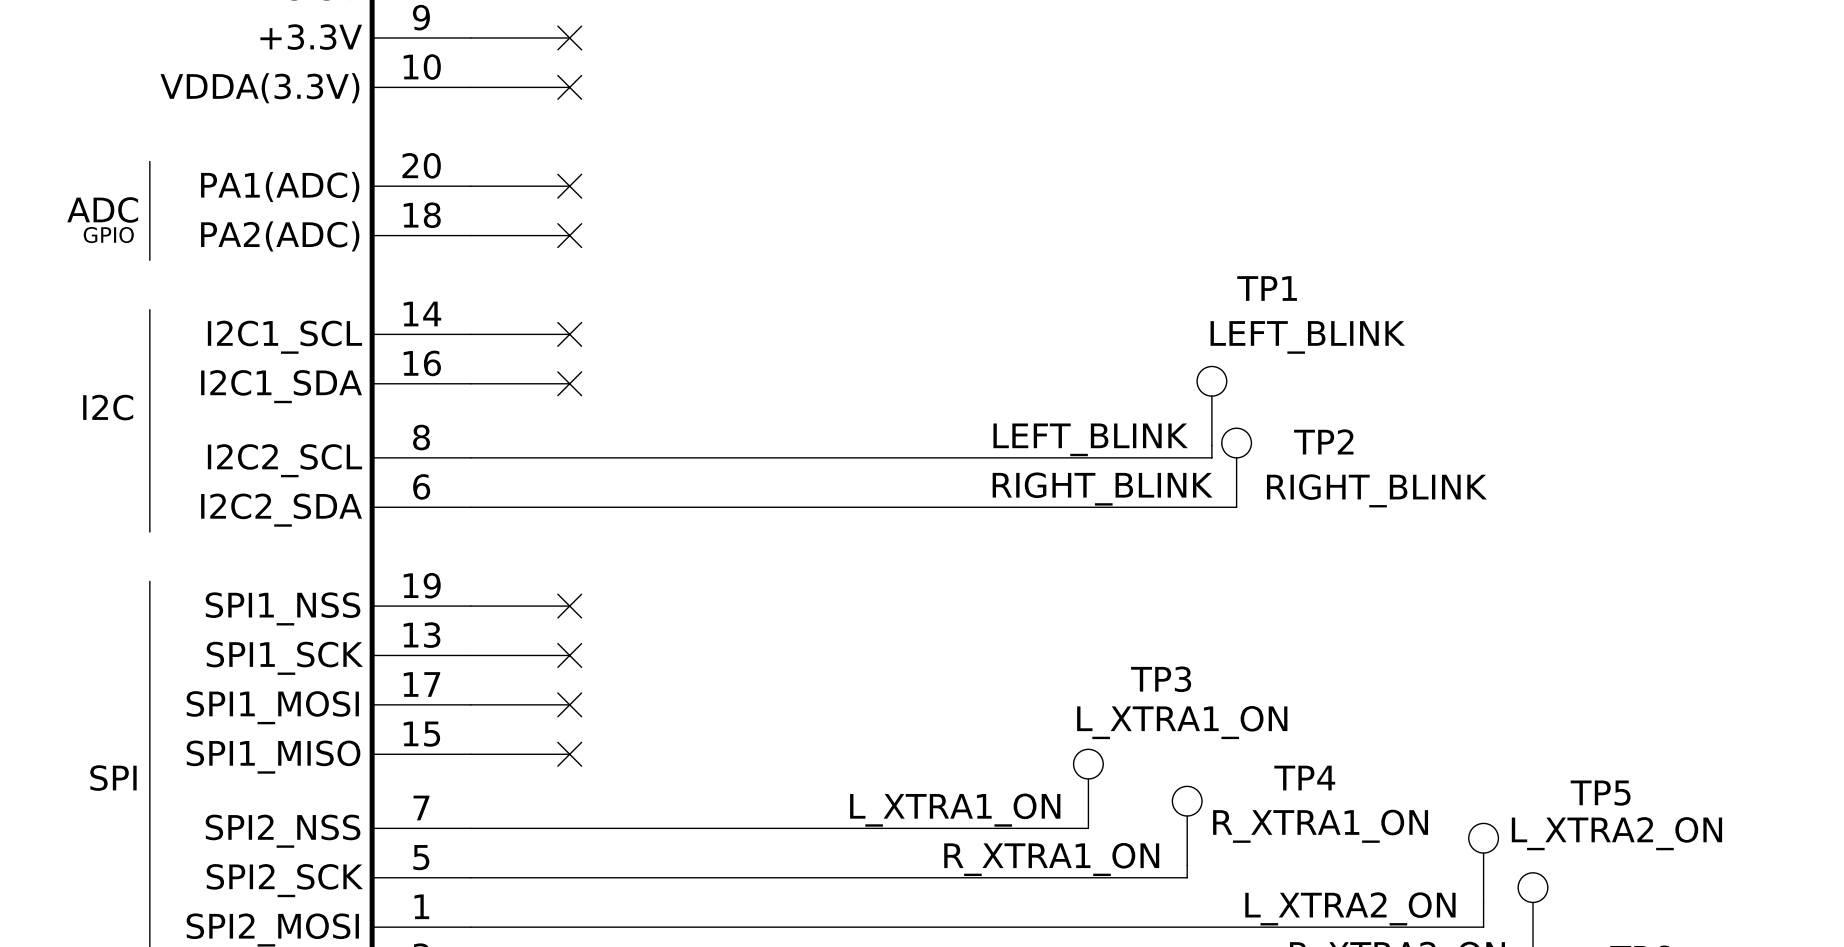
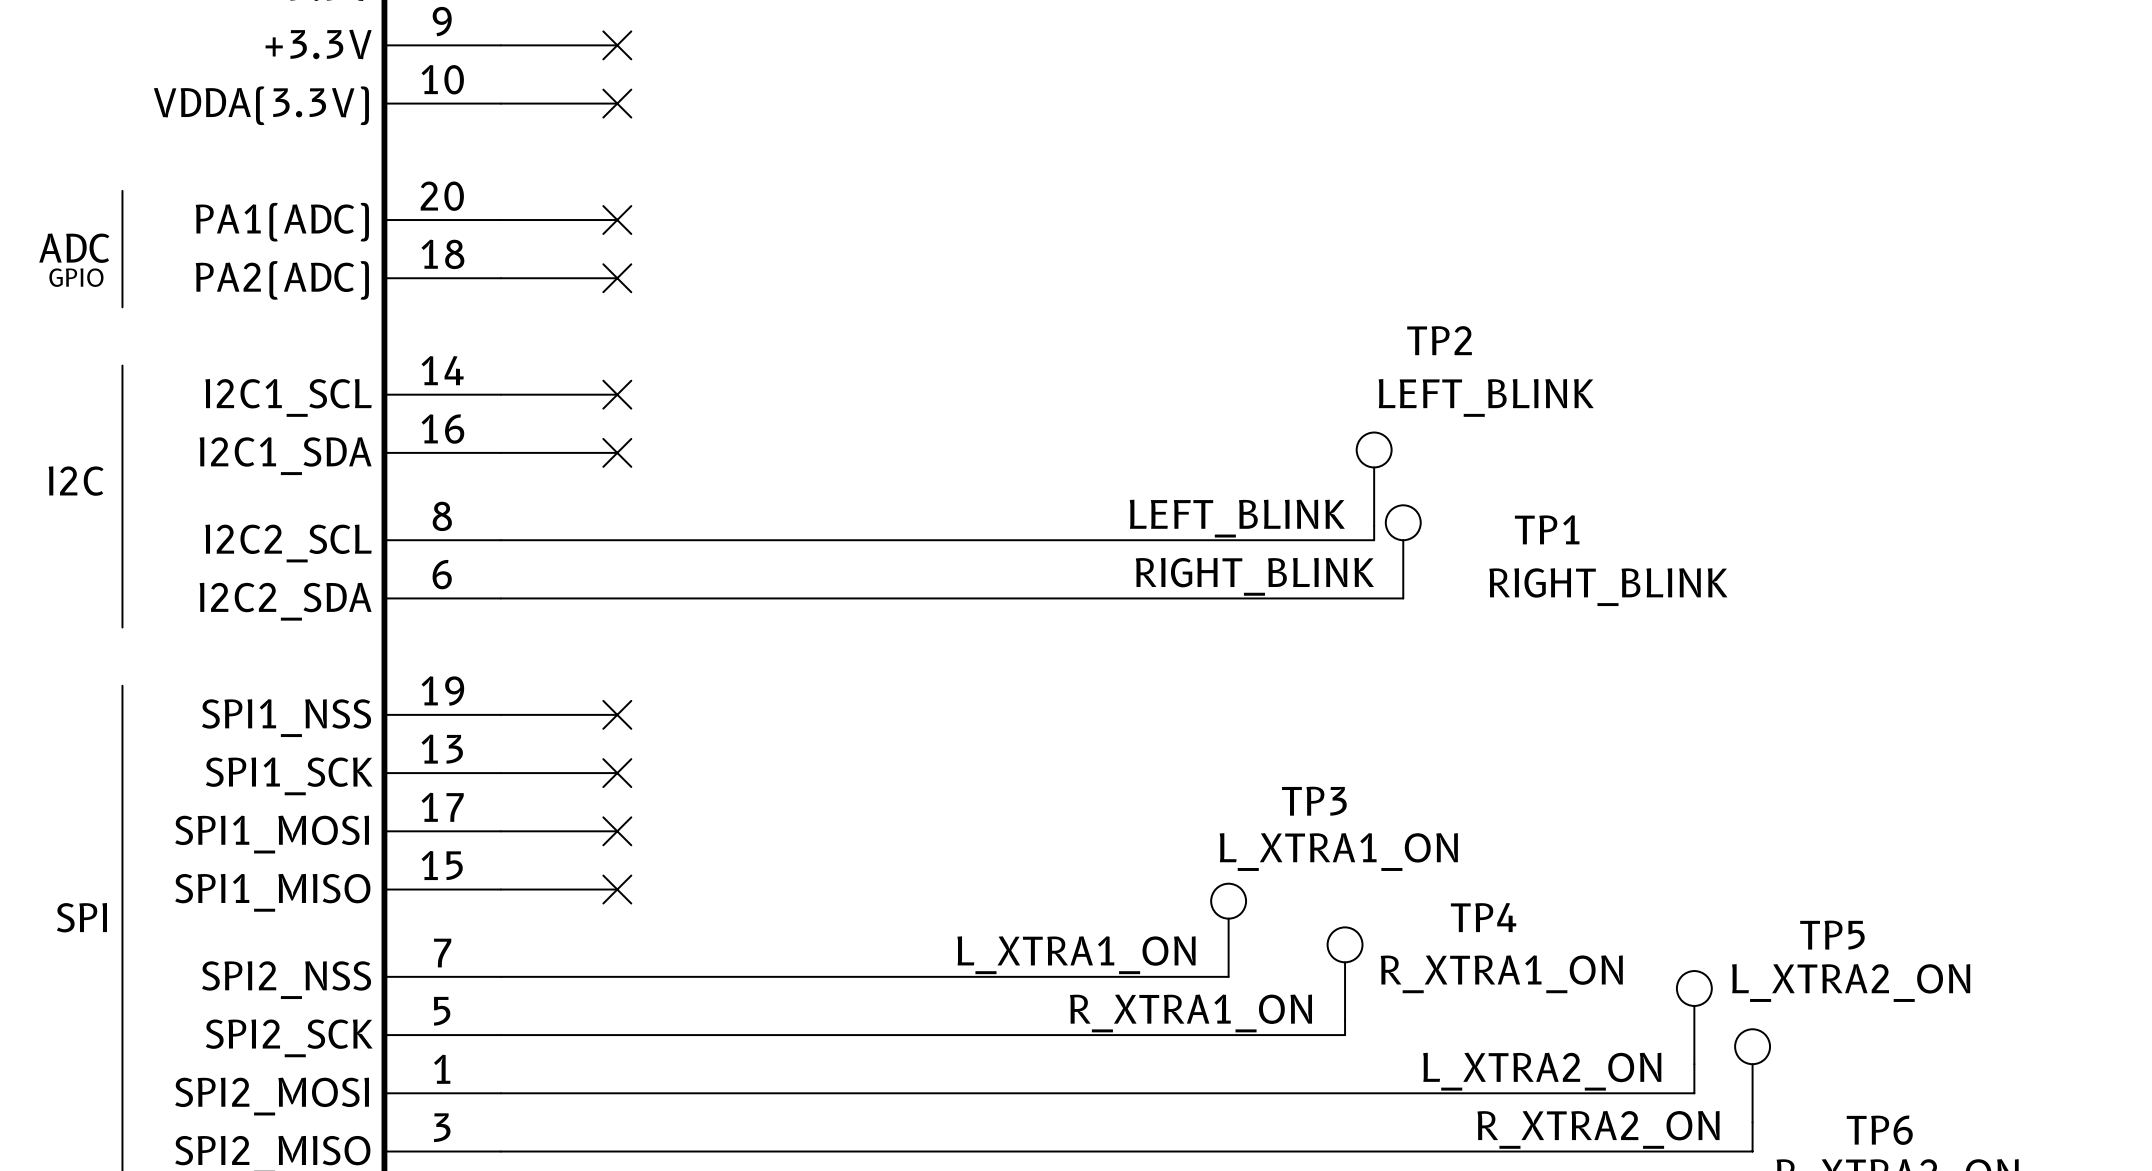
TP1 name: TP1 (1267, 288) -> TP2 (1439, 340)
TP2 name: TP2 (1323, 441) -> TP1 (1547, 529)
TP2 value position: RIGHT_BLINK (1376, 490) -> RIGHT_BLINK (1608, 587)

